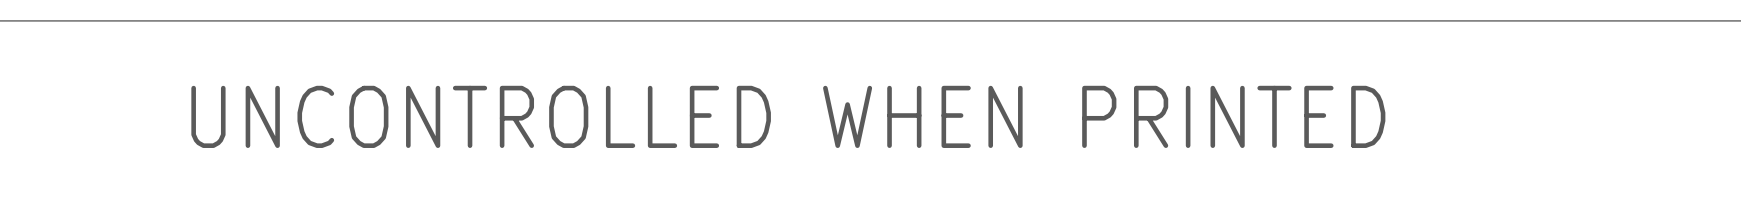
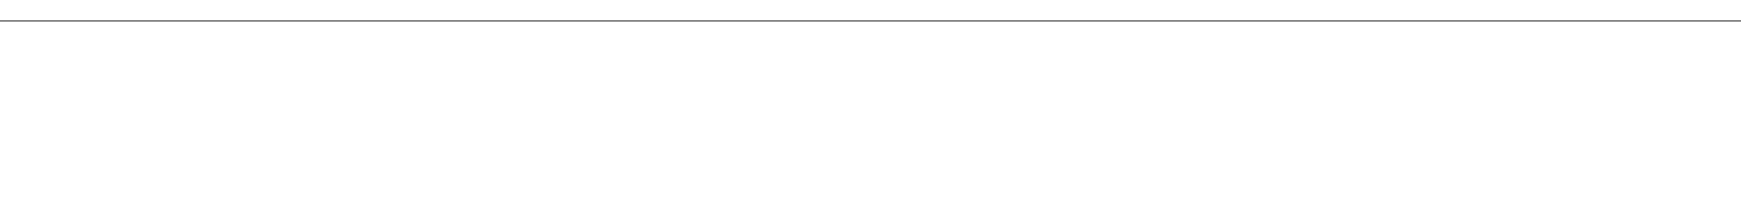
text: UNCONTROLLED WHEN PRINTED (788, 116) -> none

